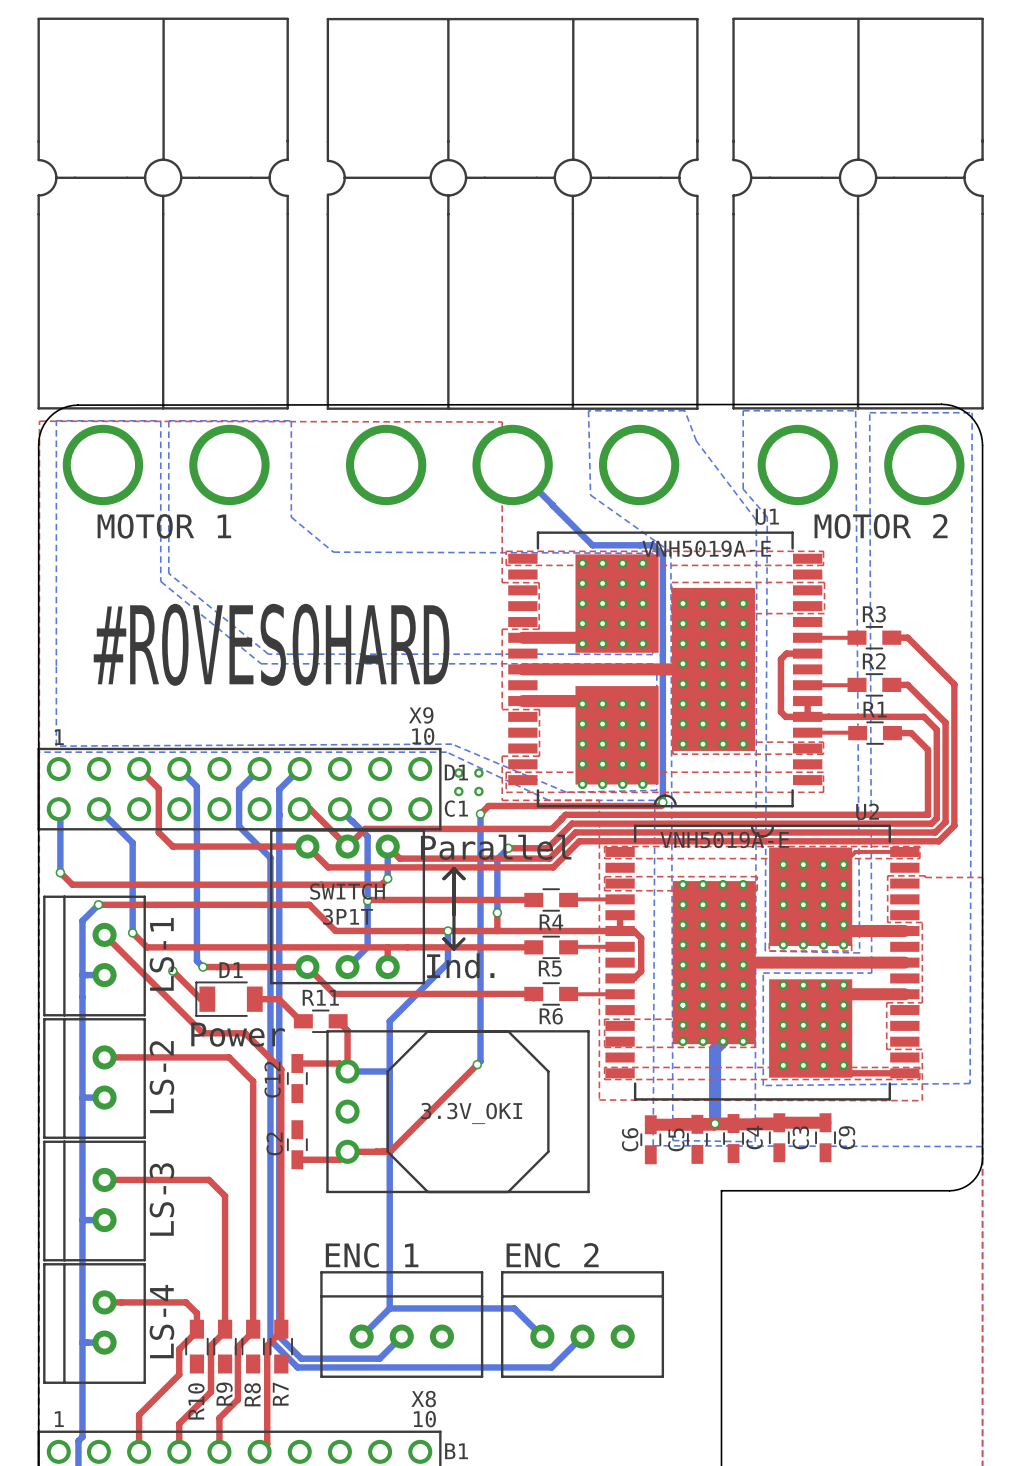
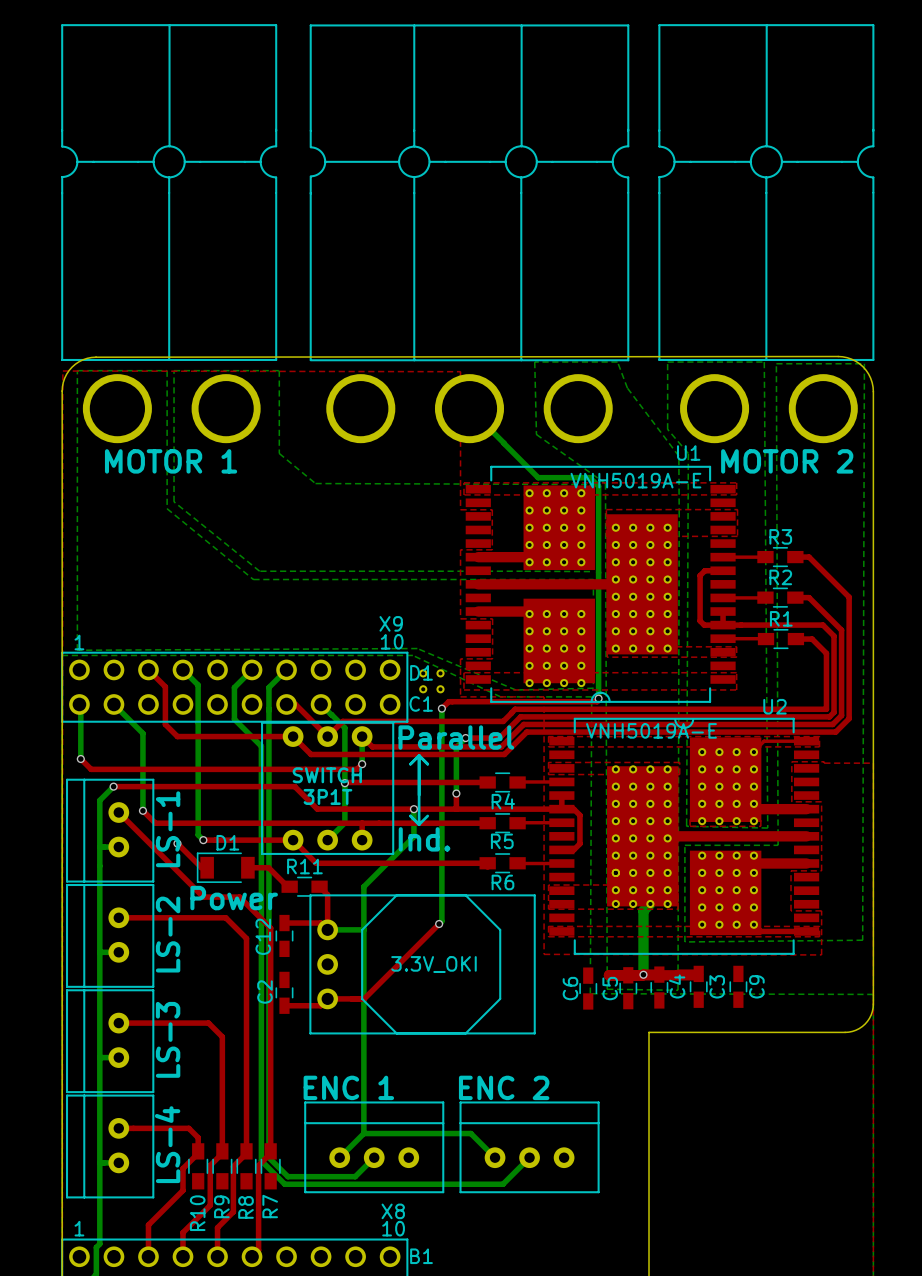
text: #ROVESOHARD (271, 644) -> none
top track: (779, 1122) (825, 1122) -> none
top track: (674, 1124) (650, 1124) -> none

